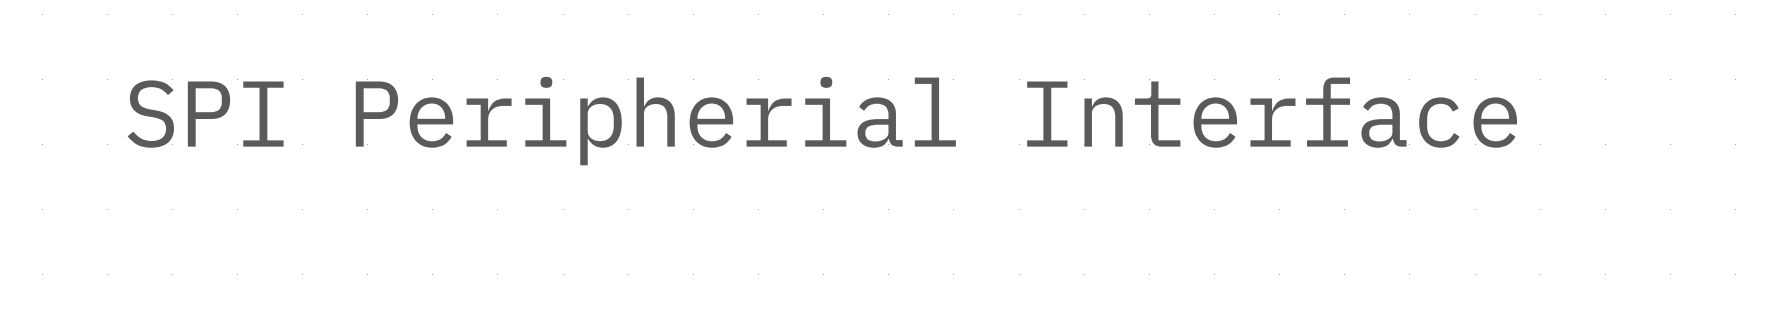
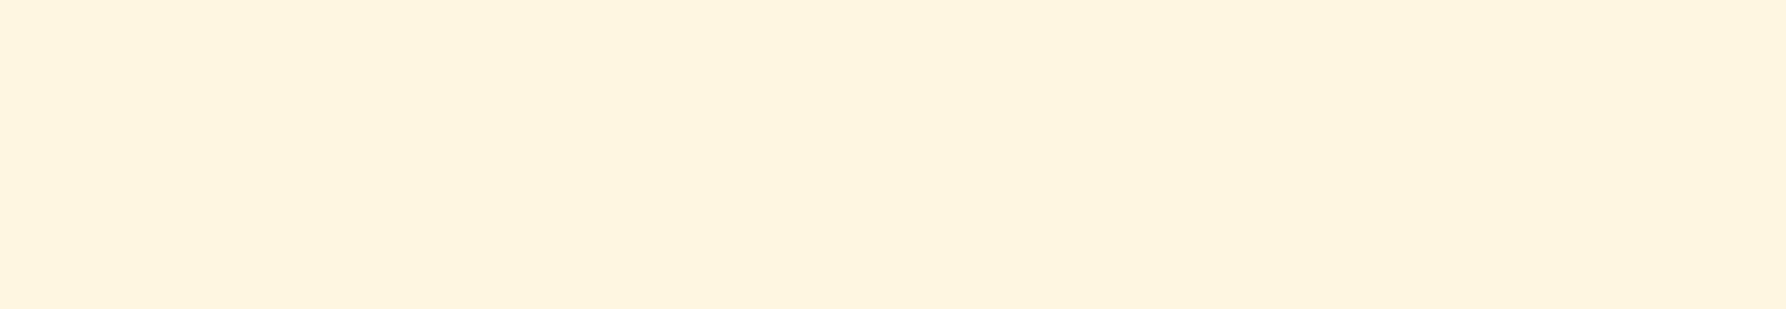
text: SPI Peripherial Interface (822, 121) -> none

